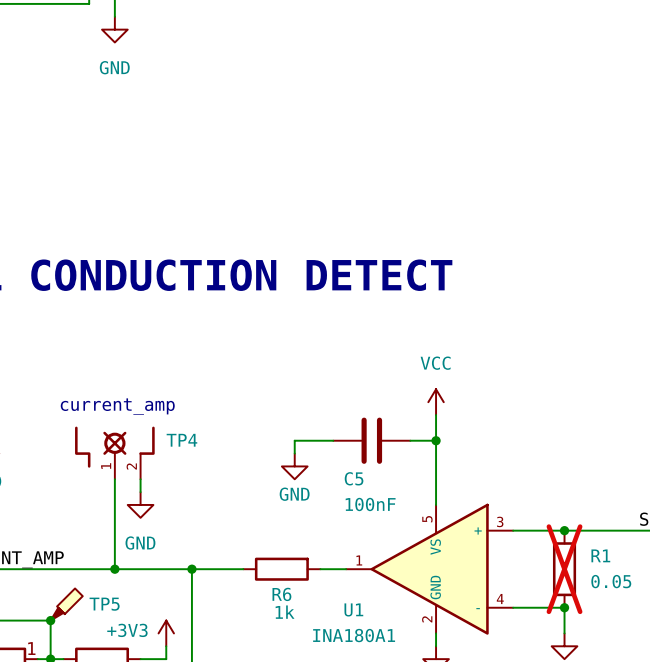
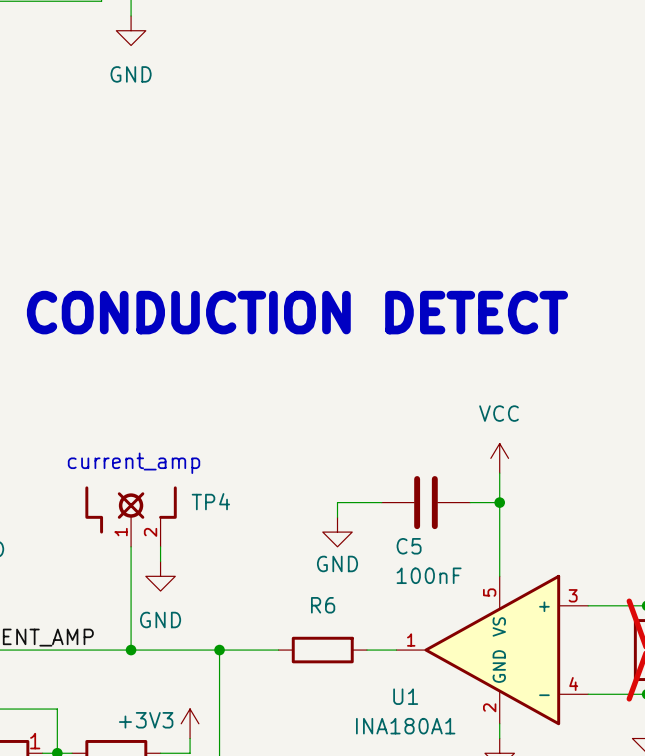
R6 name position: R6 (281, 594) -> R6 (323, 605)
TP5: (66, 604) -> none
R6 value: 1k (285, 612) -> none
junction: (50, 620) -> none

